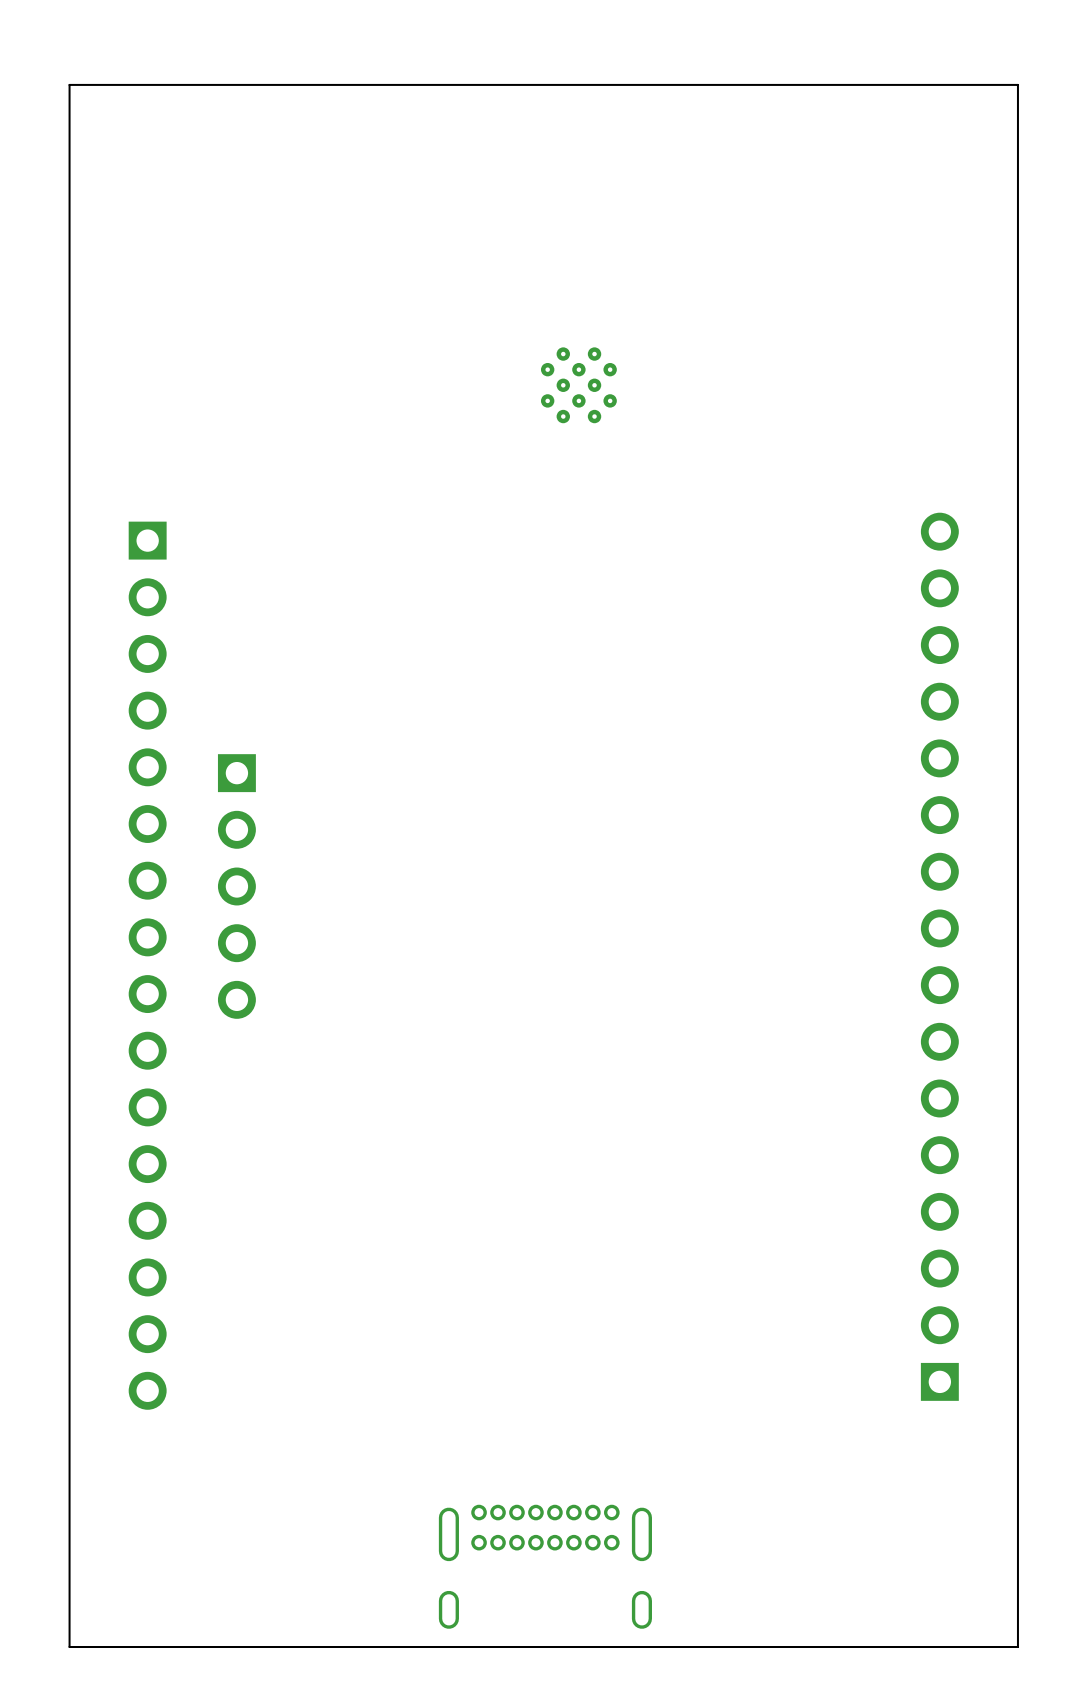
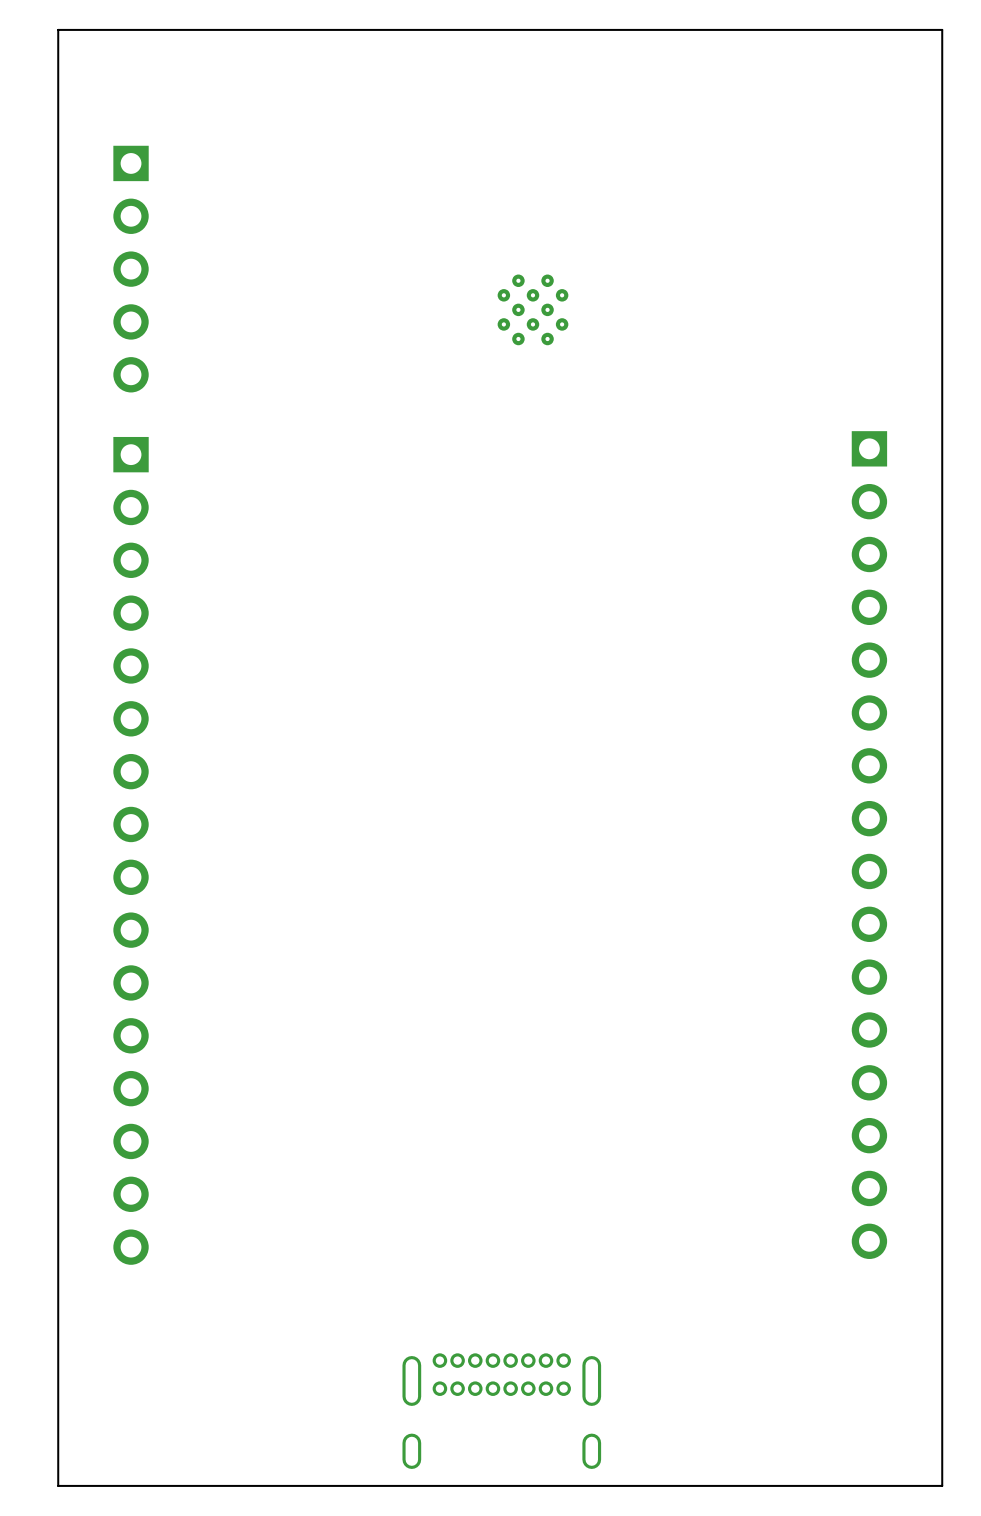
part position: (236, 886) -> (131, 269)
part rotation: 0° (939, 956) -> 180° (869, 845)

